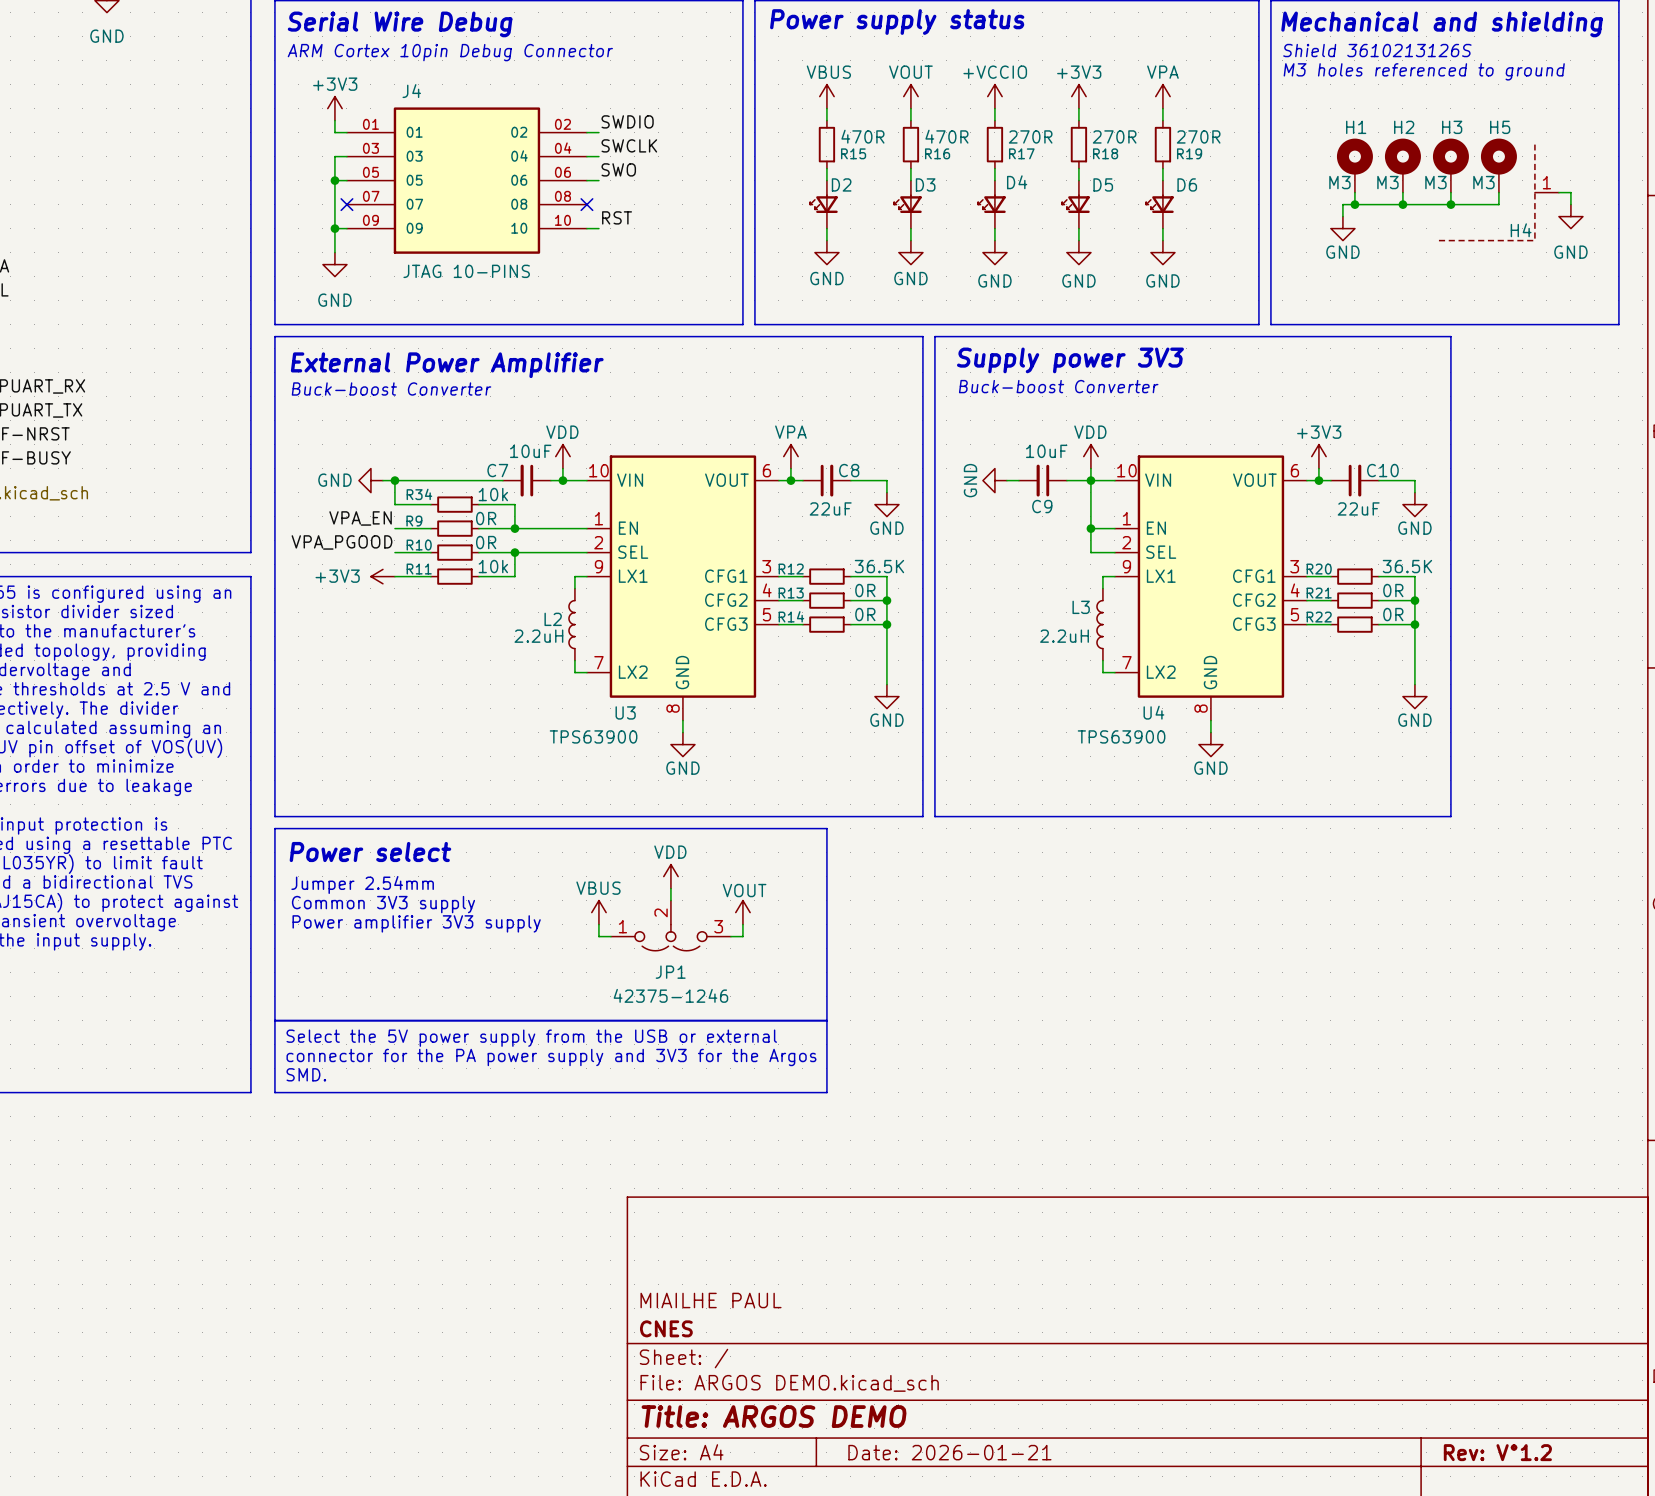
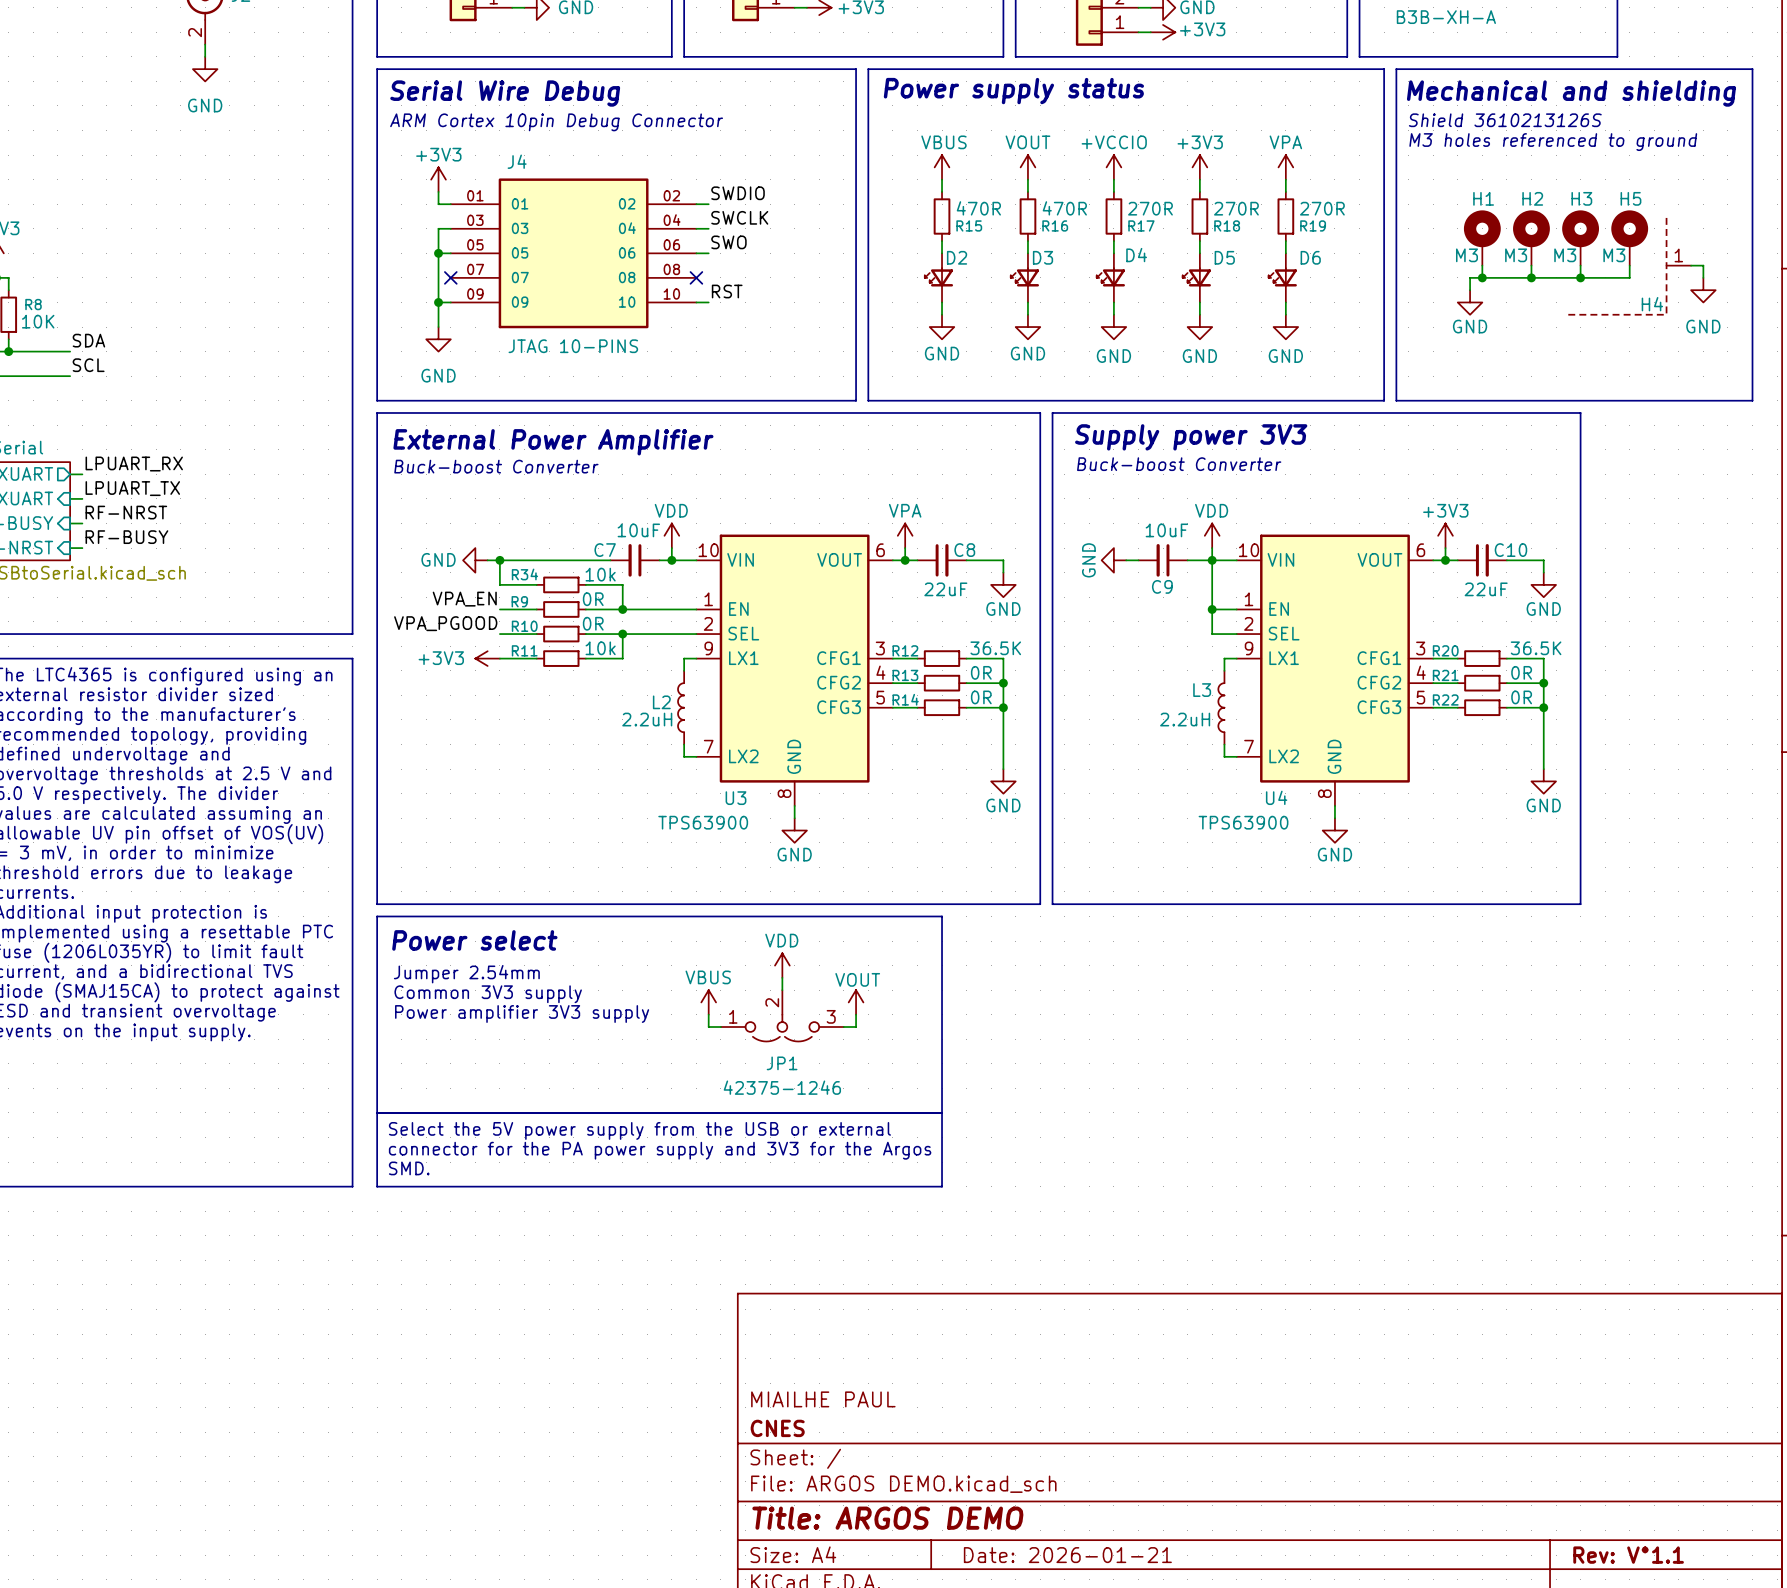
title block: Rev: V°1.2 (1497, 1452) -> Rev: V°1.1 (1628, 1555)

